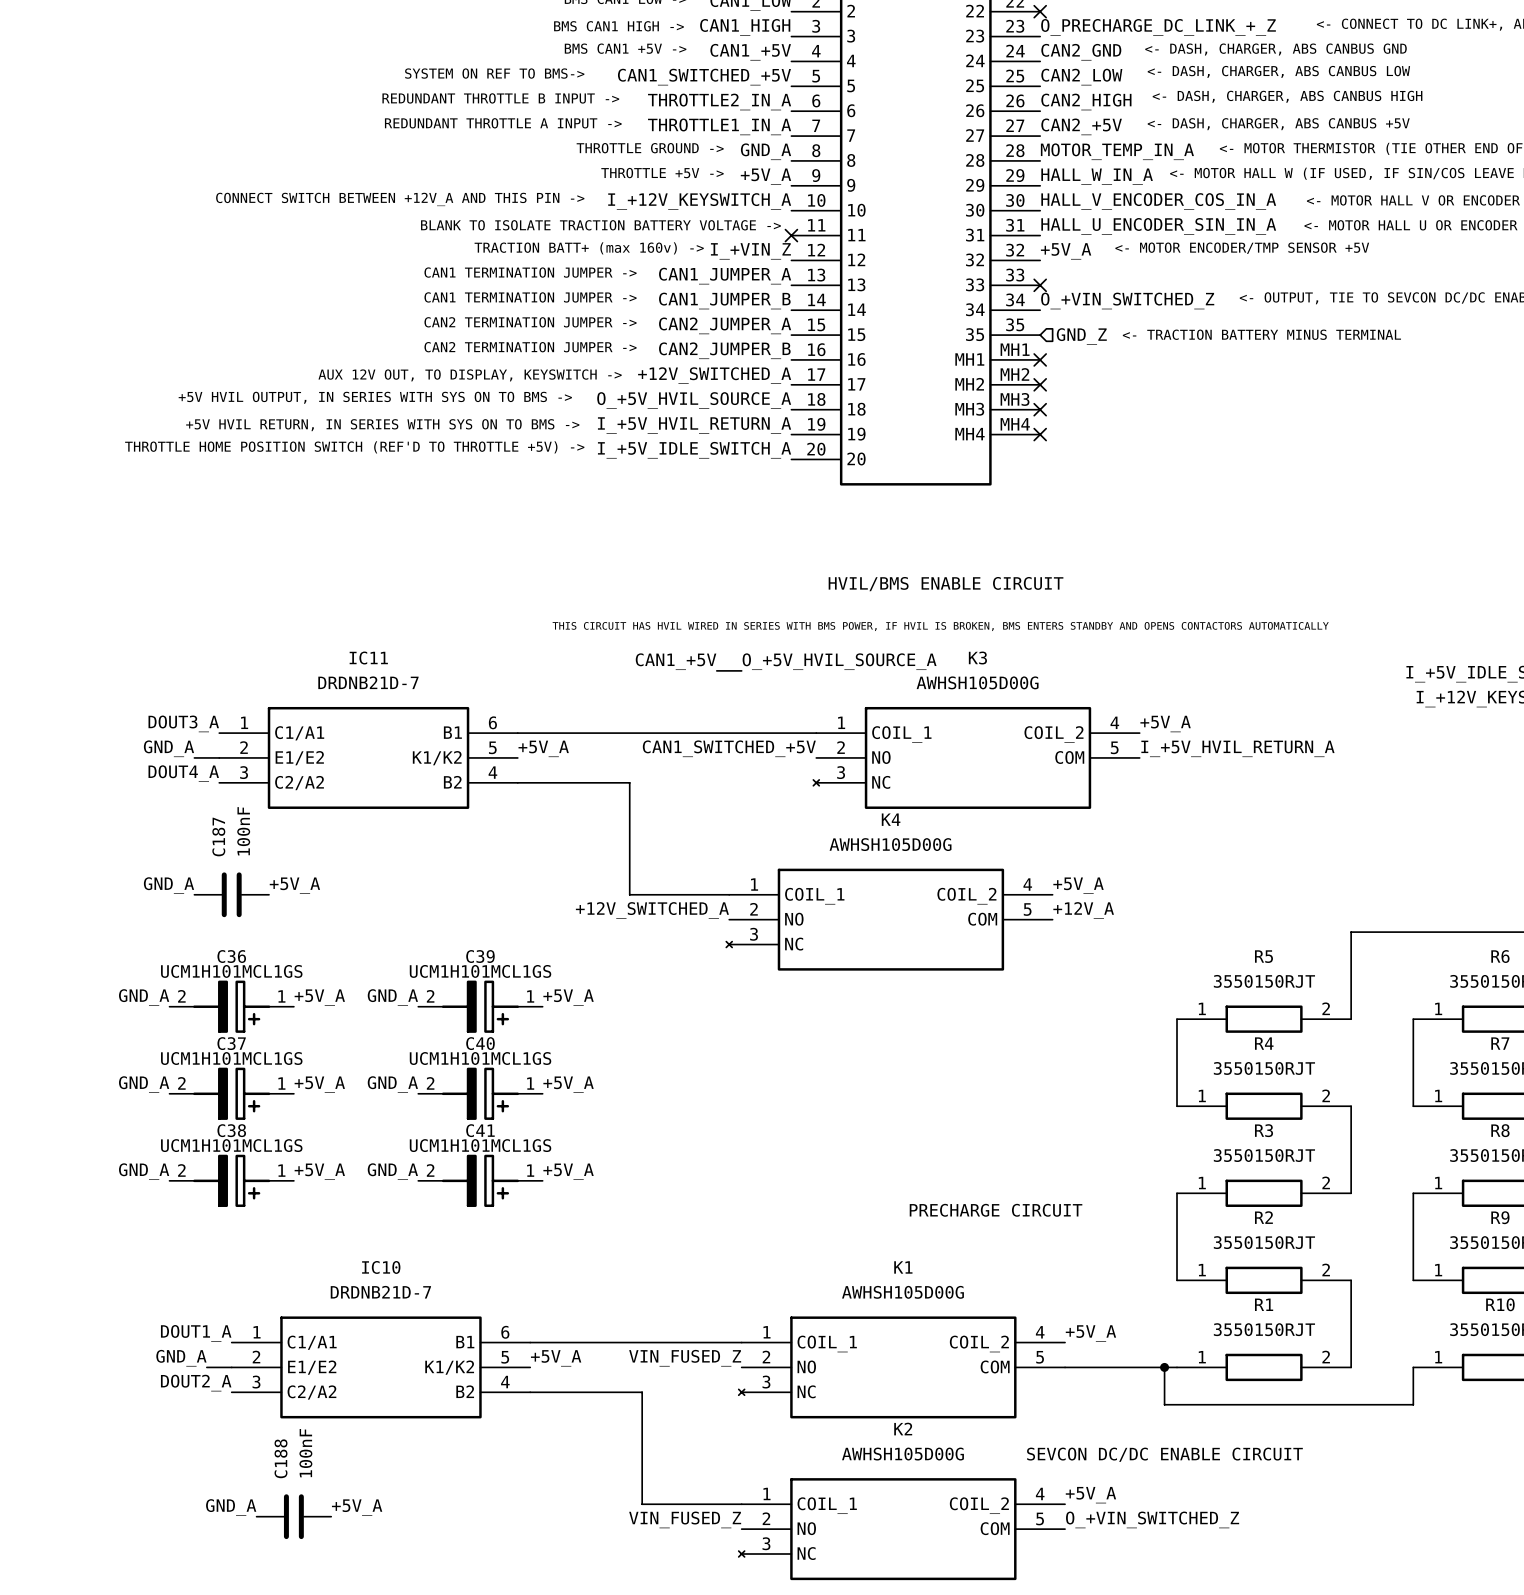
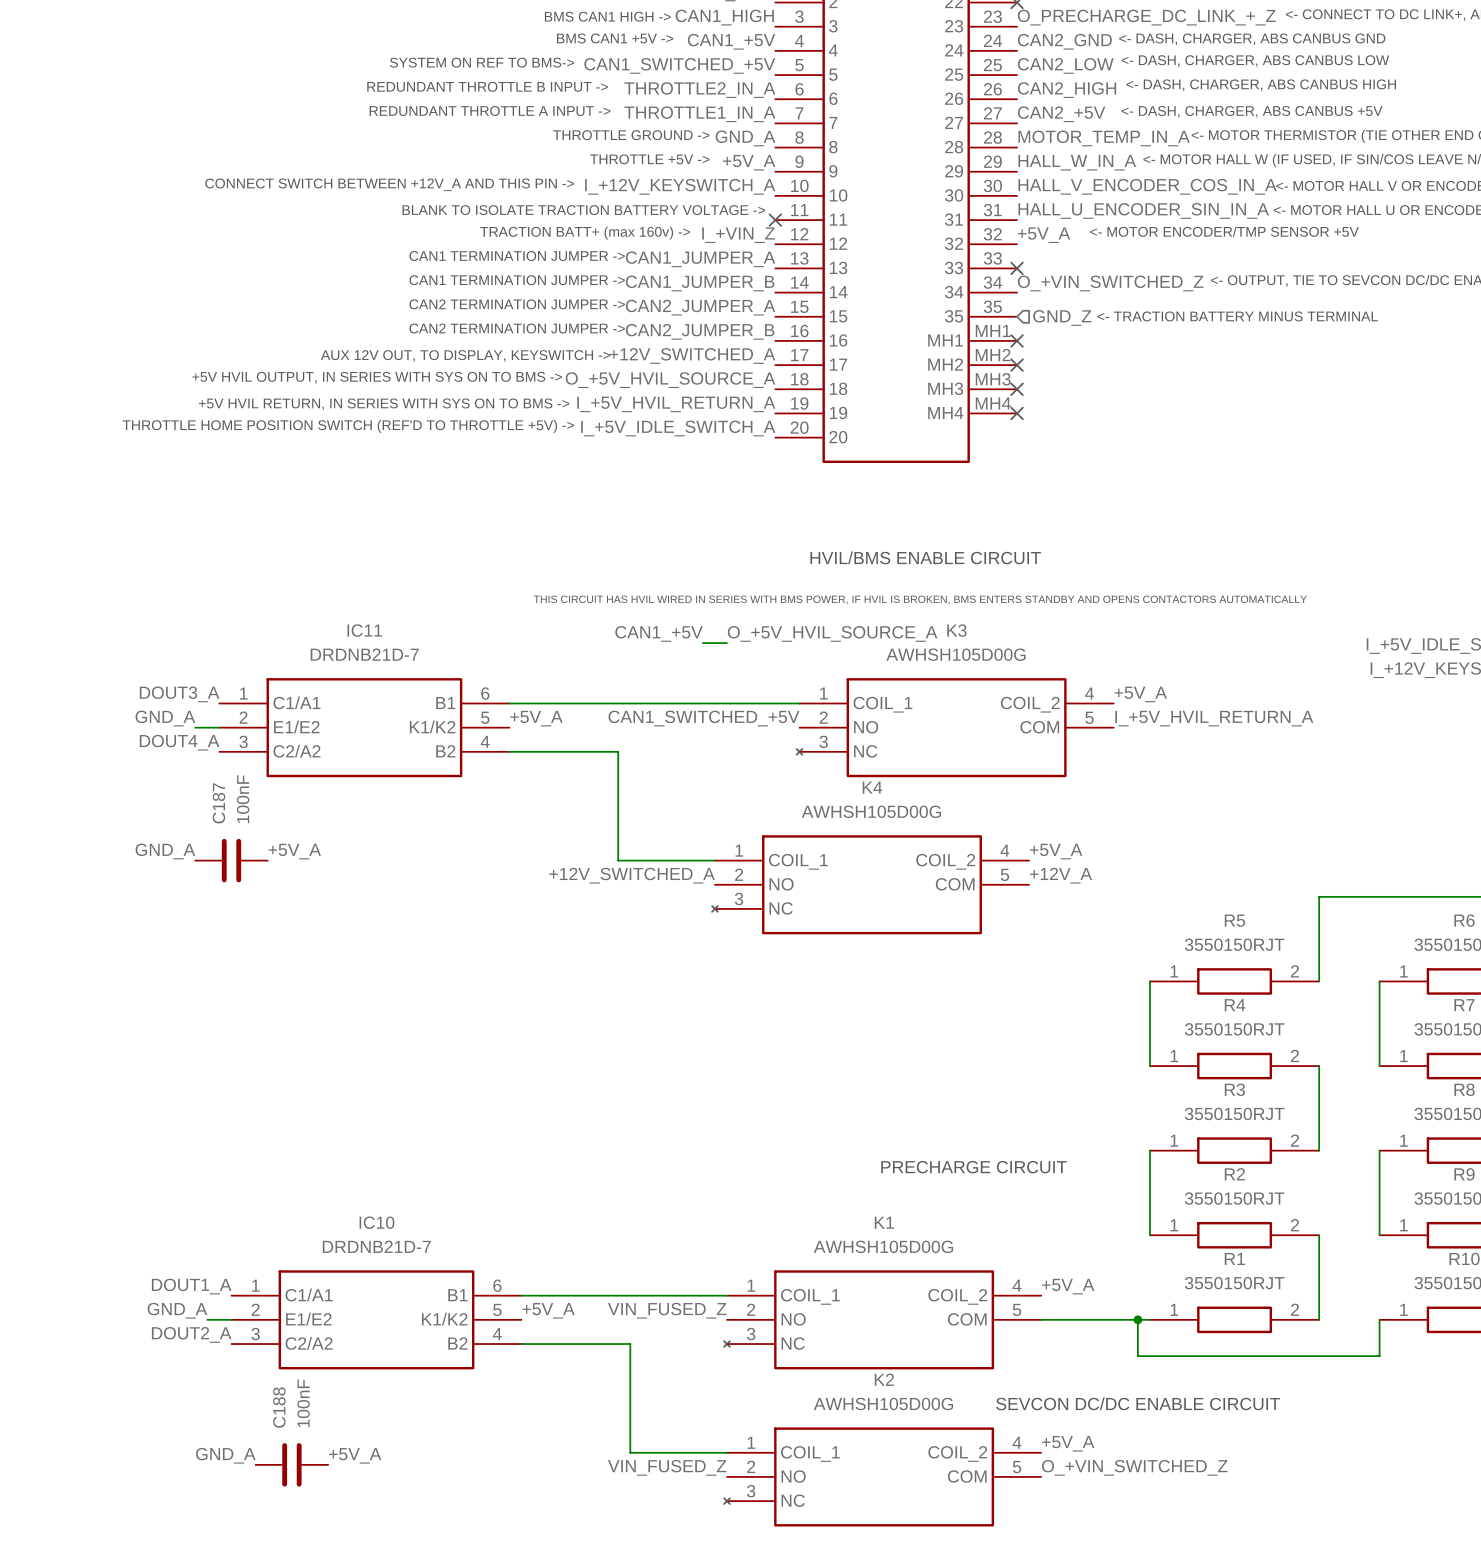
label: GND_A (144, 997) -> none
label: +5V_A (319, 997) -> none
label: GND_A (392, 997) -> none
label: +5V_A (568, 997) -> none
C36: UCM1H101MCL1GS (231, 1006) -> none
C39: UCM1H101MCL1GS (480, 1006) -> none
label: GND_A (144, 1084) -> none
label: +5V_A (319, 1084) -> none
label: GND_A (392, 1084) -> none
label: +5V_A (568, 1084) -> none
C37: UCM1H101MCL1GS (231, 1093) -> none
C40: UCM1H101MCL1GS (480, 1093) -> none
label: GND_A (144, 1171) -> none
label: +5V_A (319, 1171) -> none
label: GND_A (392, 1171) -> none
label: +5V_A (568, 1171) -> none
C38: UCM1H101MCL1GS (231, 1180) -> none
C41: UCM1H101MCL1GS (480, 1180) -> none

